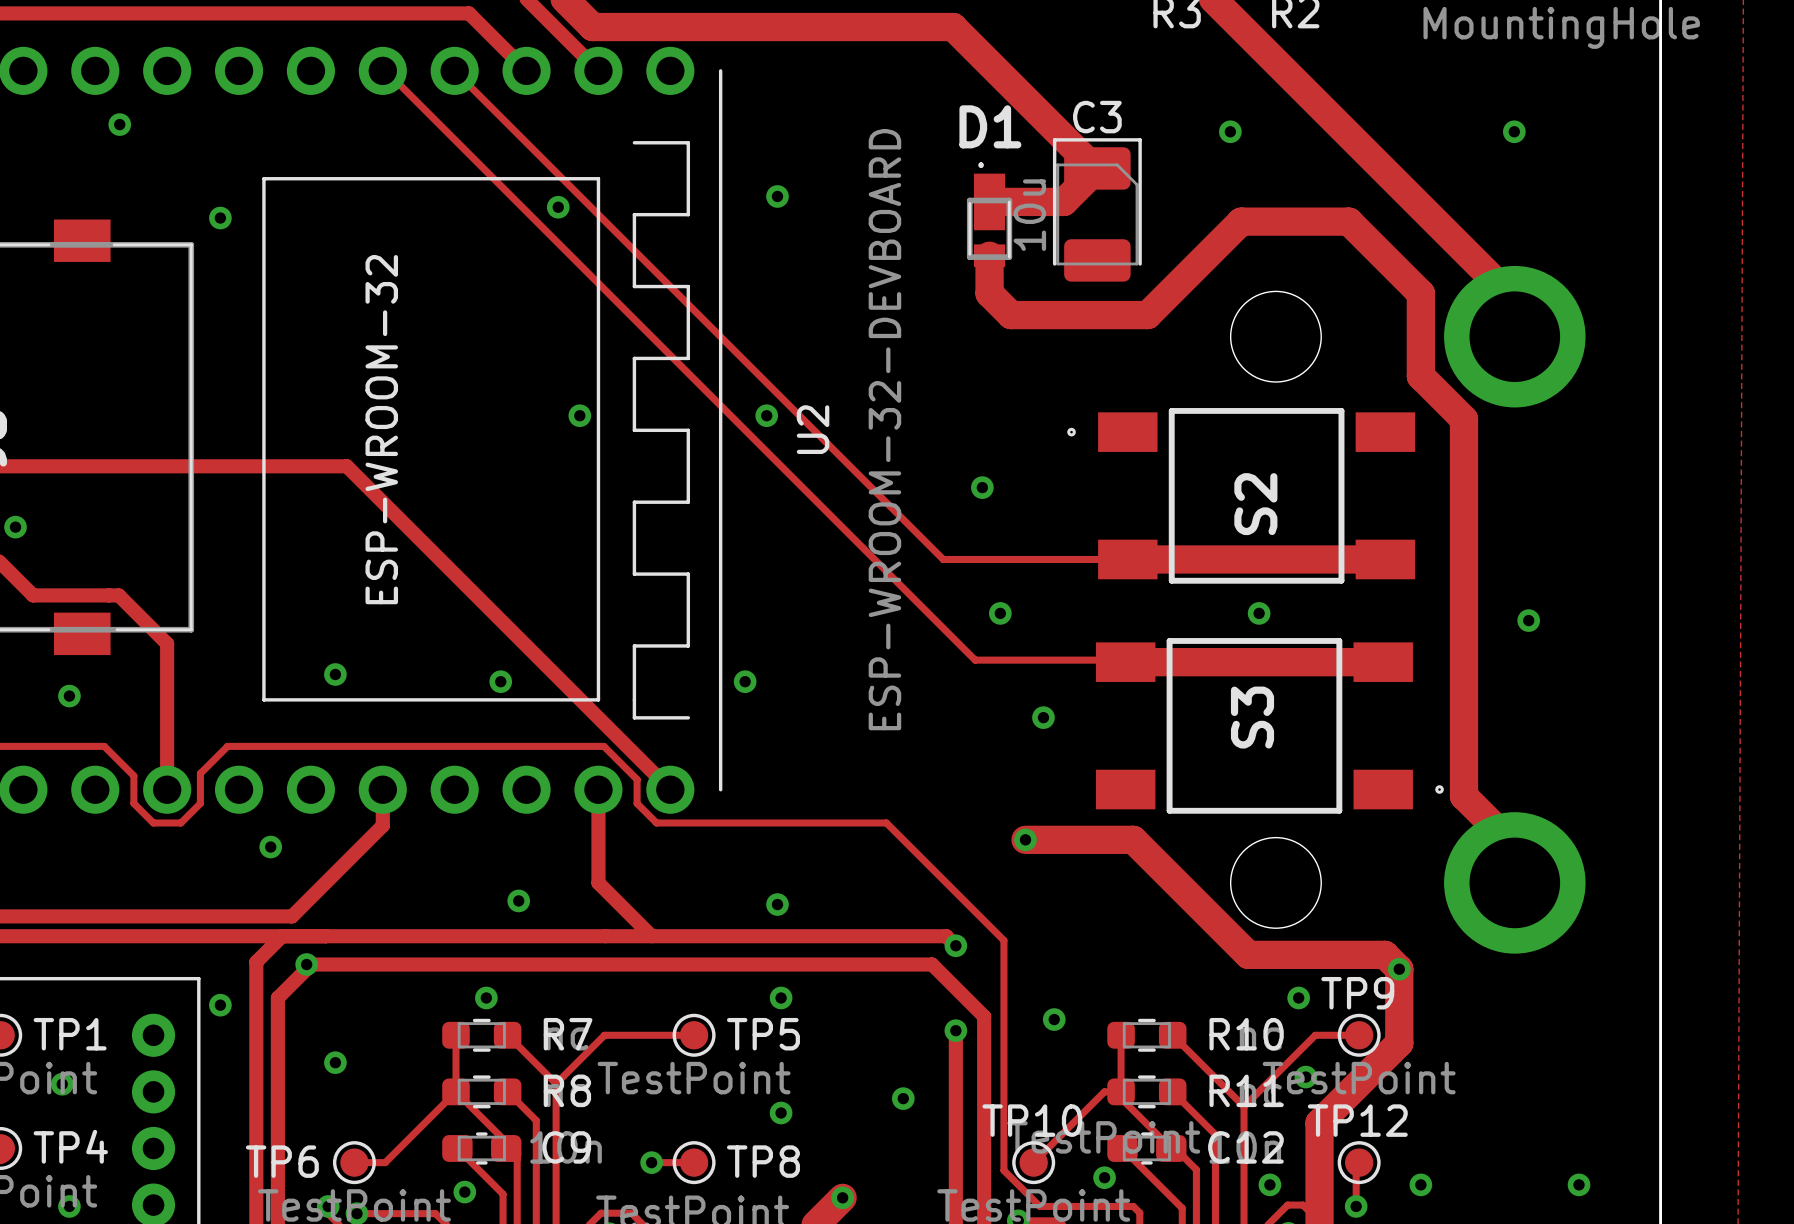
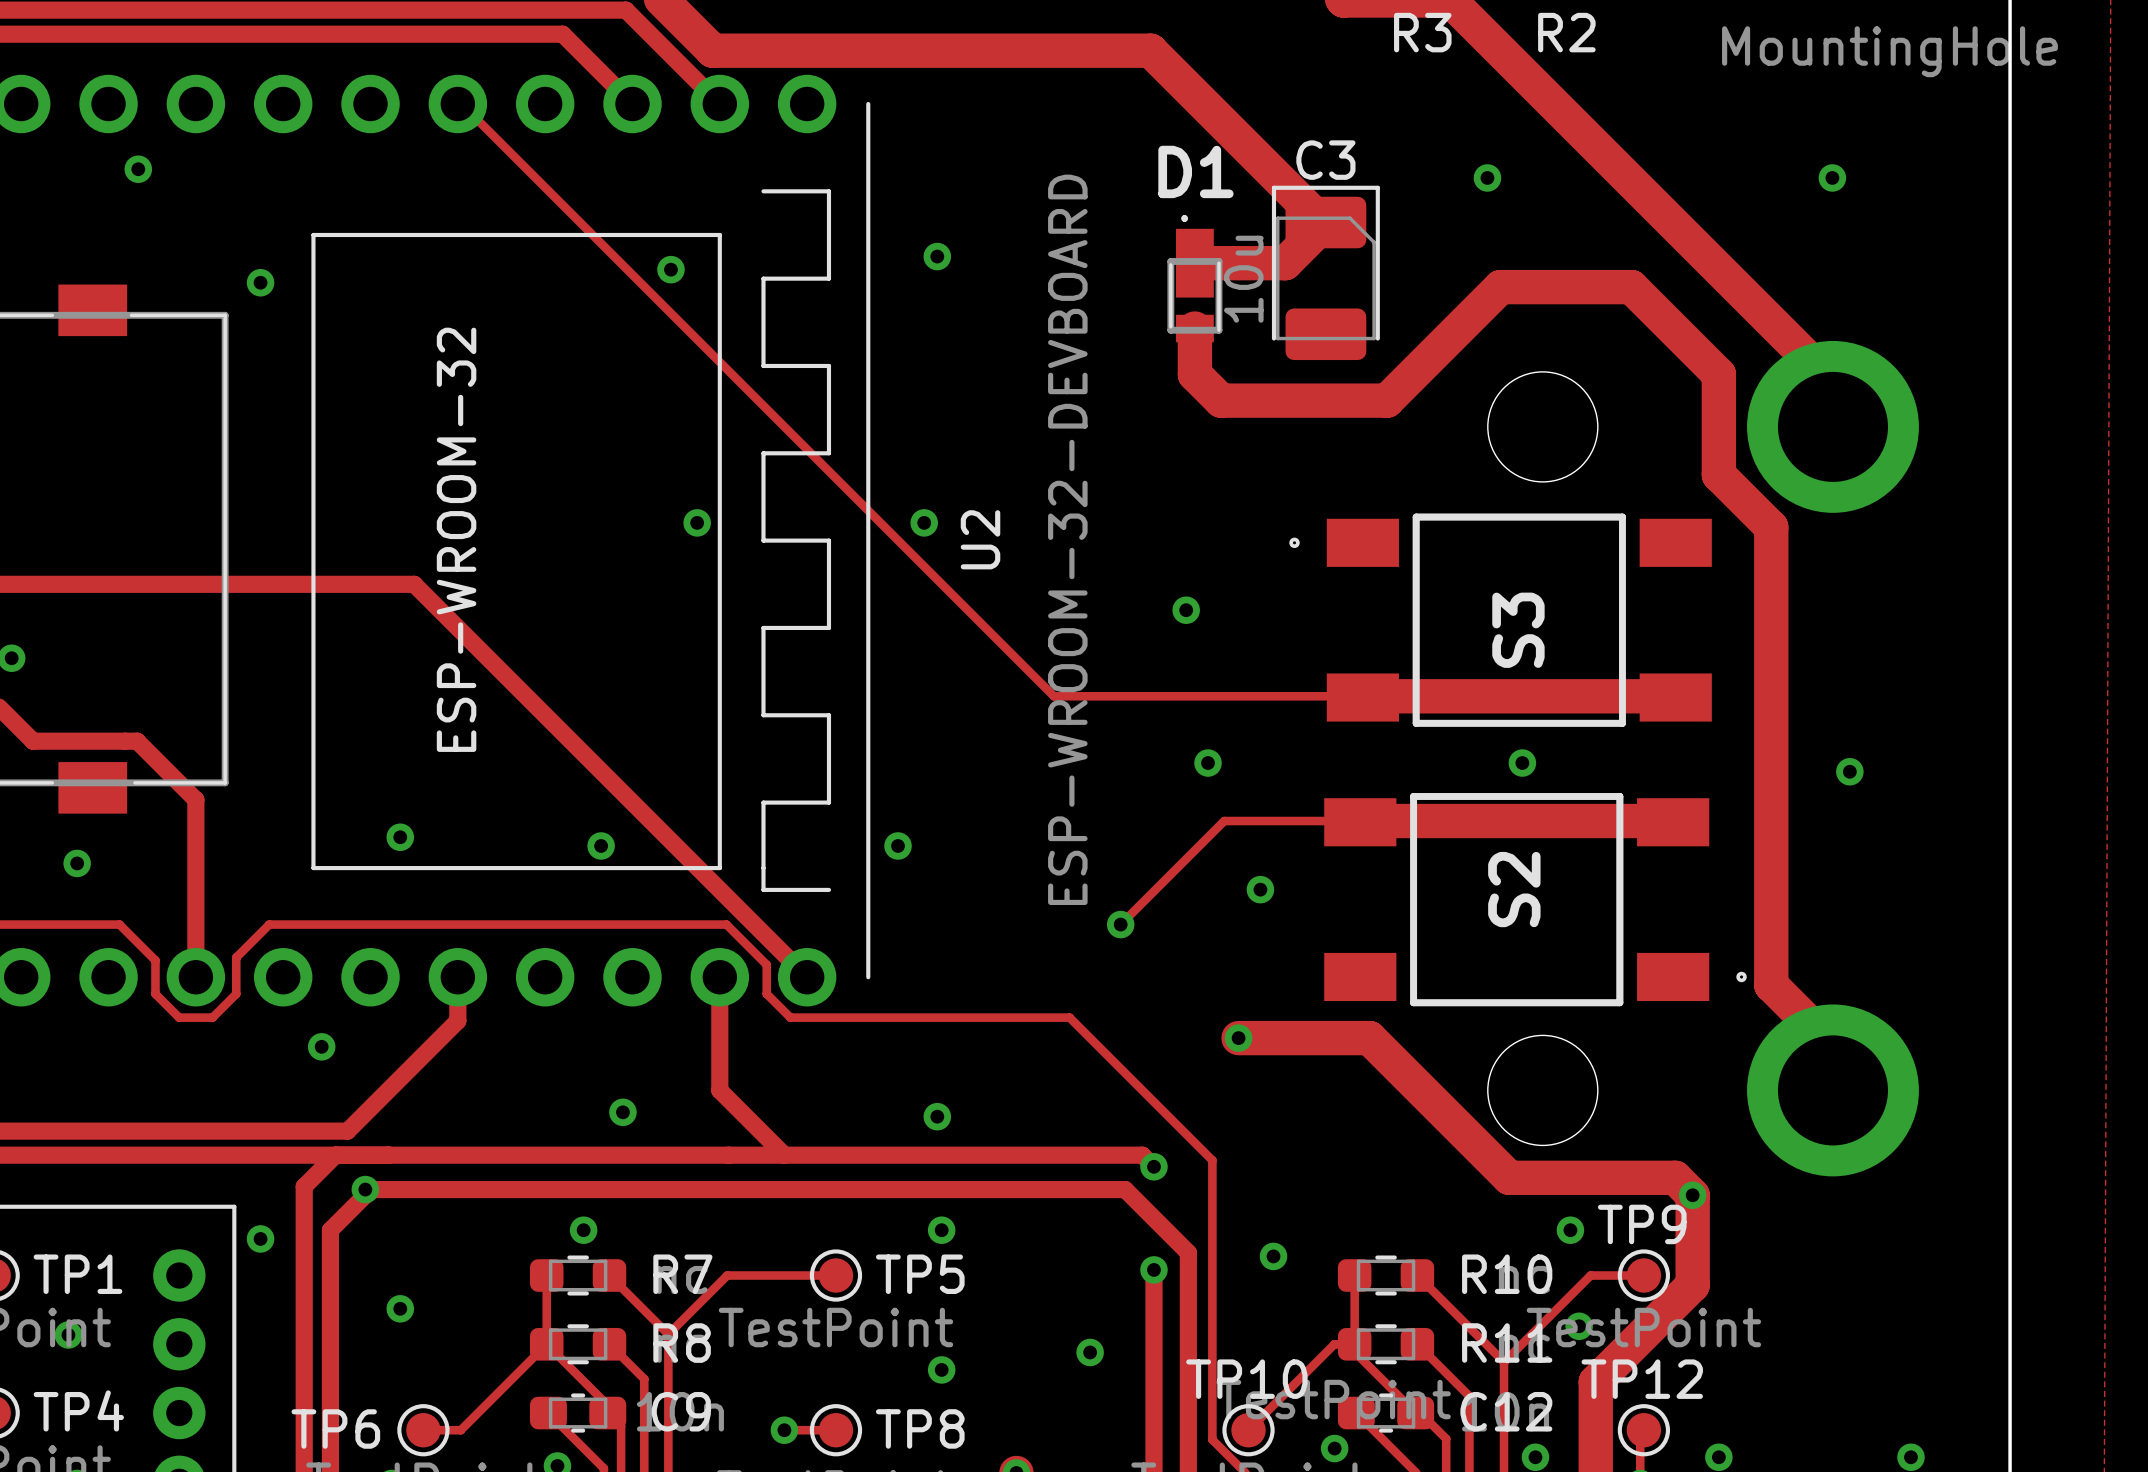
track: (454, 70) (943, 559) (1385, 559) -> none
S2 name: S2 (1255, 504) -> S3 (1518, 630)
track: (873, 558) (975, 660) (1125, 660) -> (1053, 696) (1675, 696)
track: (1125, 662) (1383, 662) -> (1120, 924) (1224, 821) (1673, 821)
S3 name: S3 (1252, 717) -> S2 (1514, 889)
via: none -> (1120, 924)

